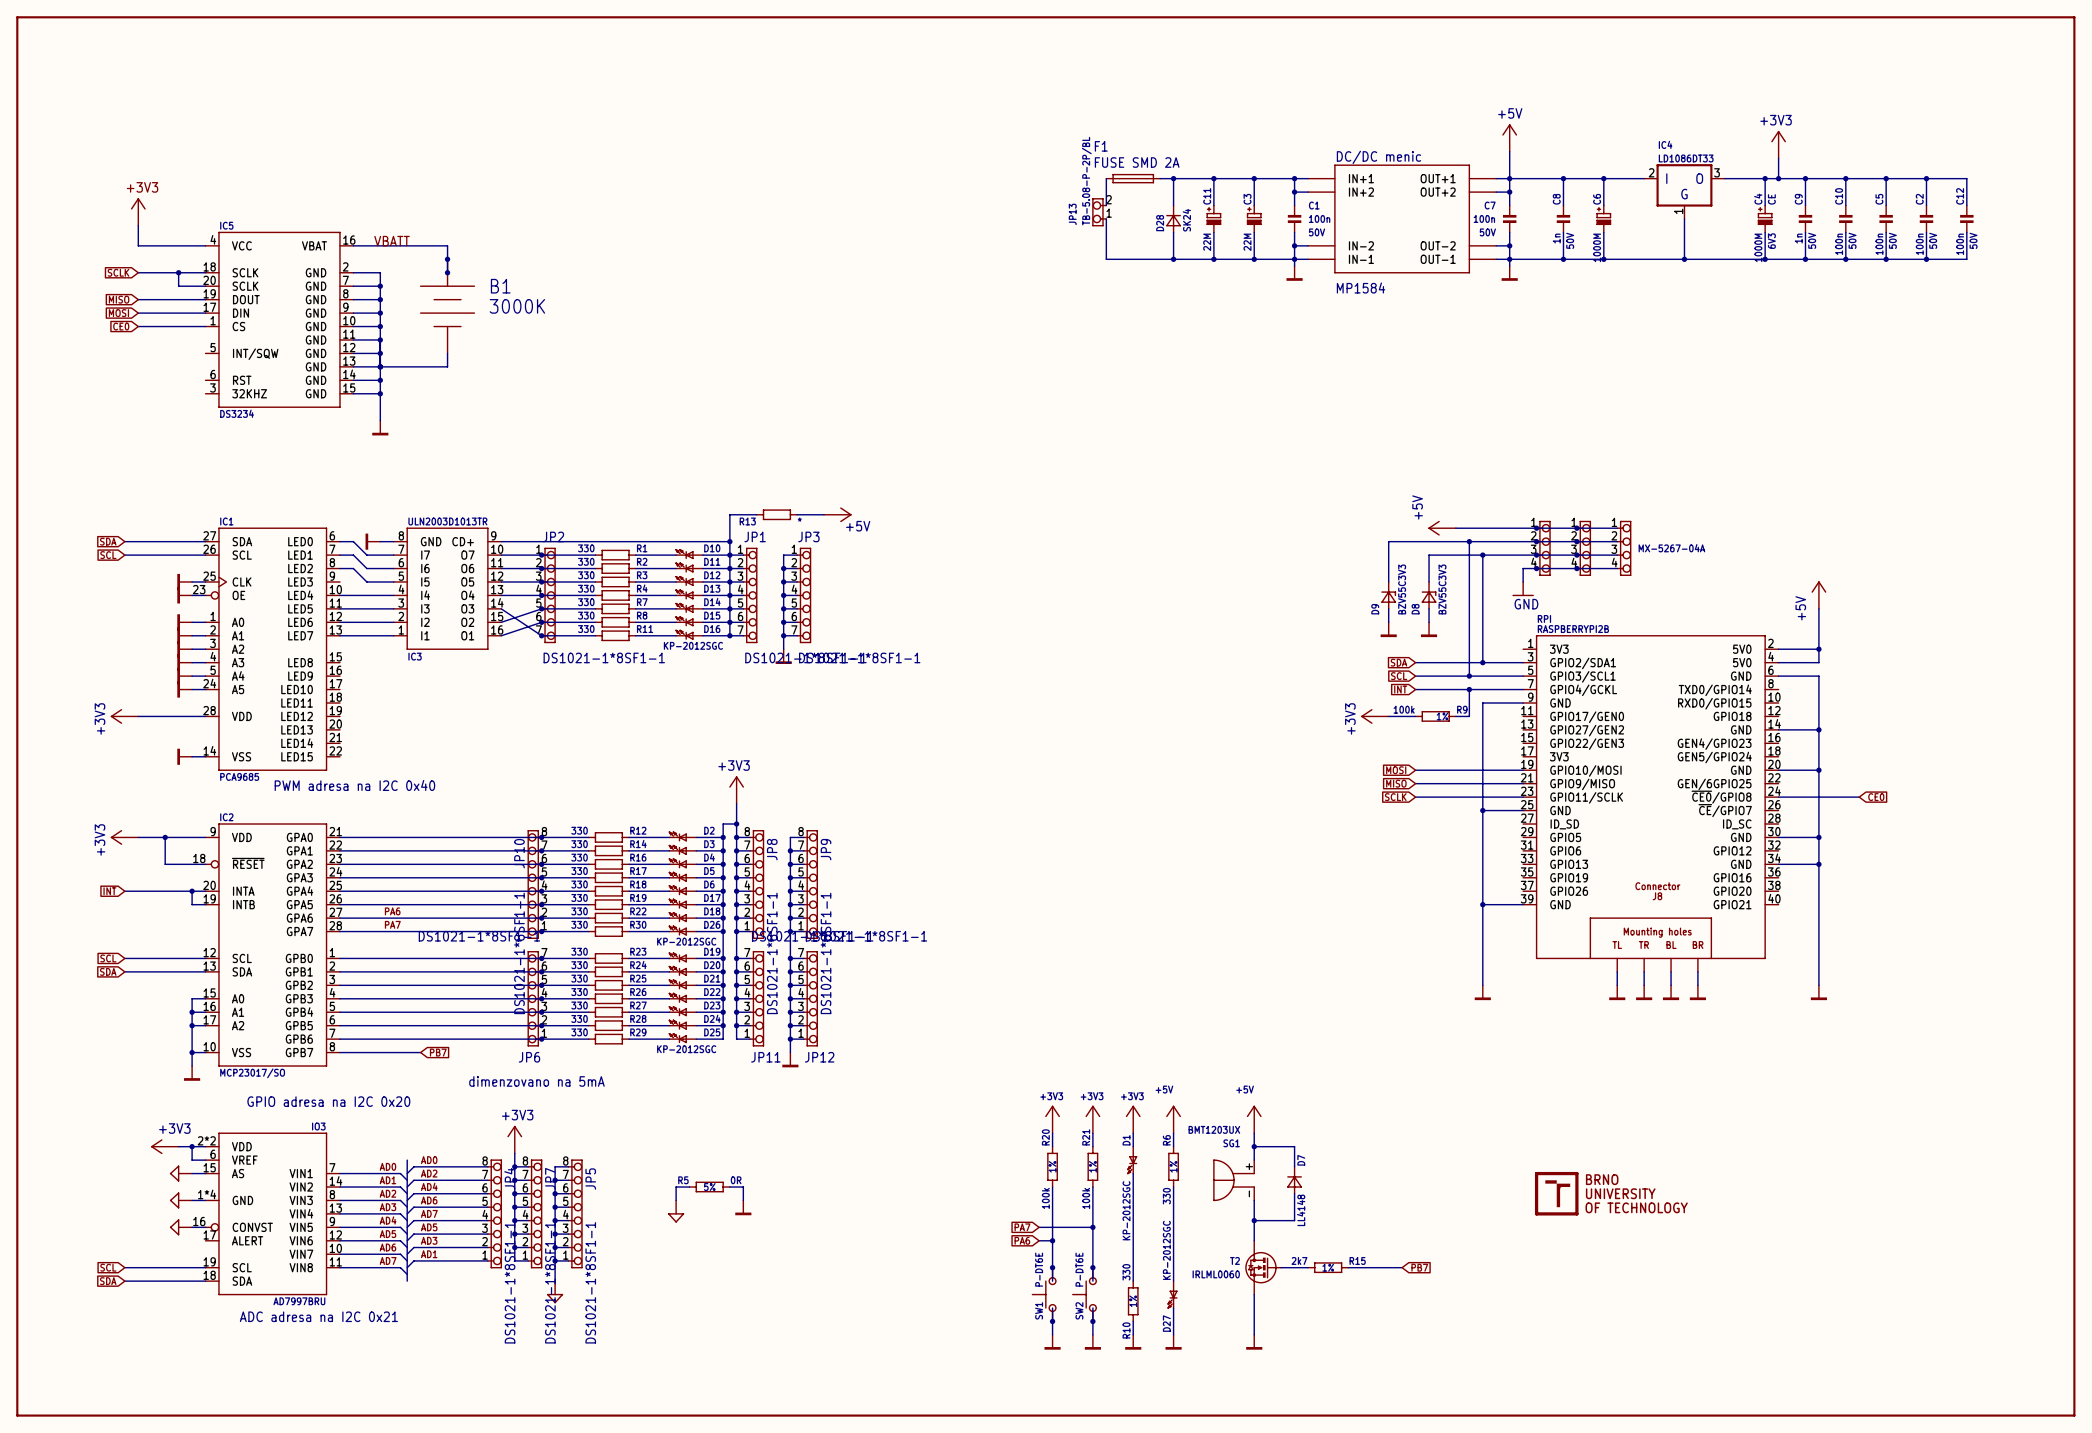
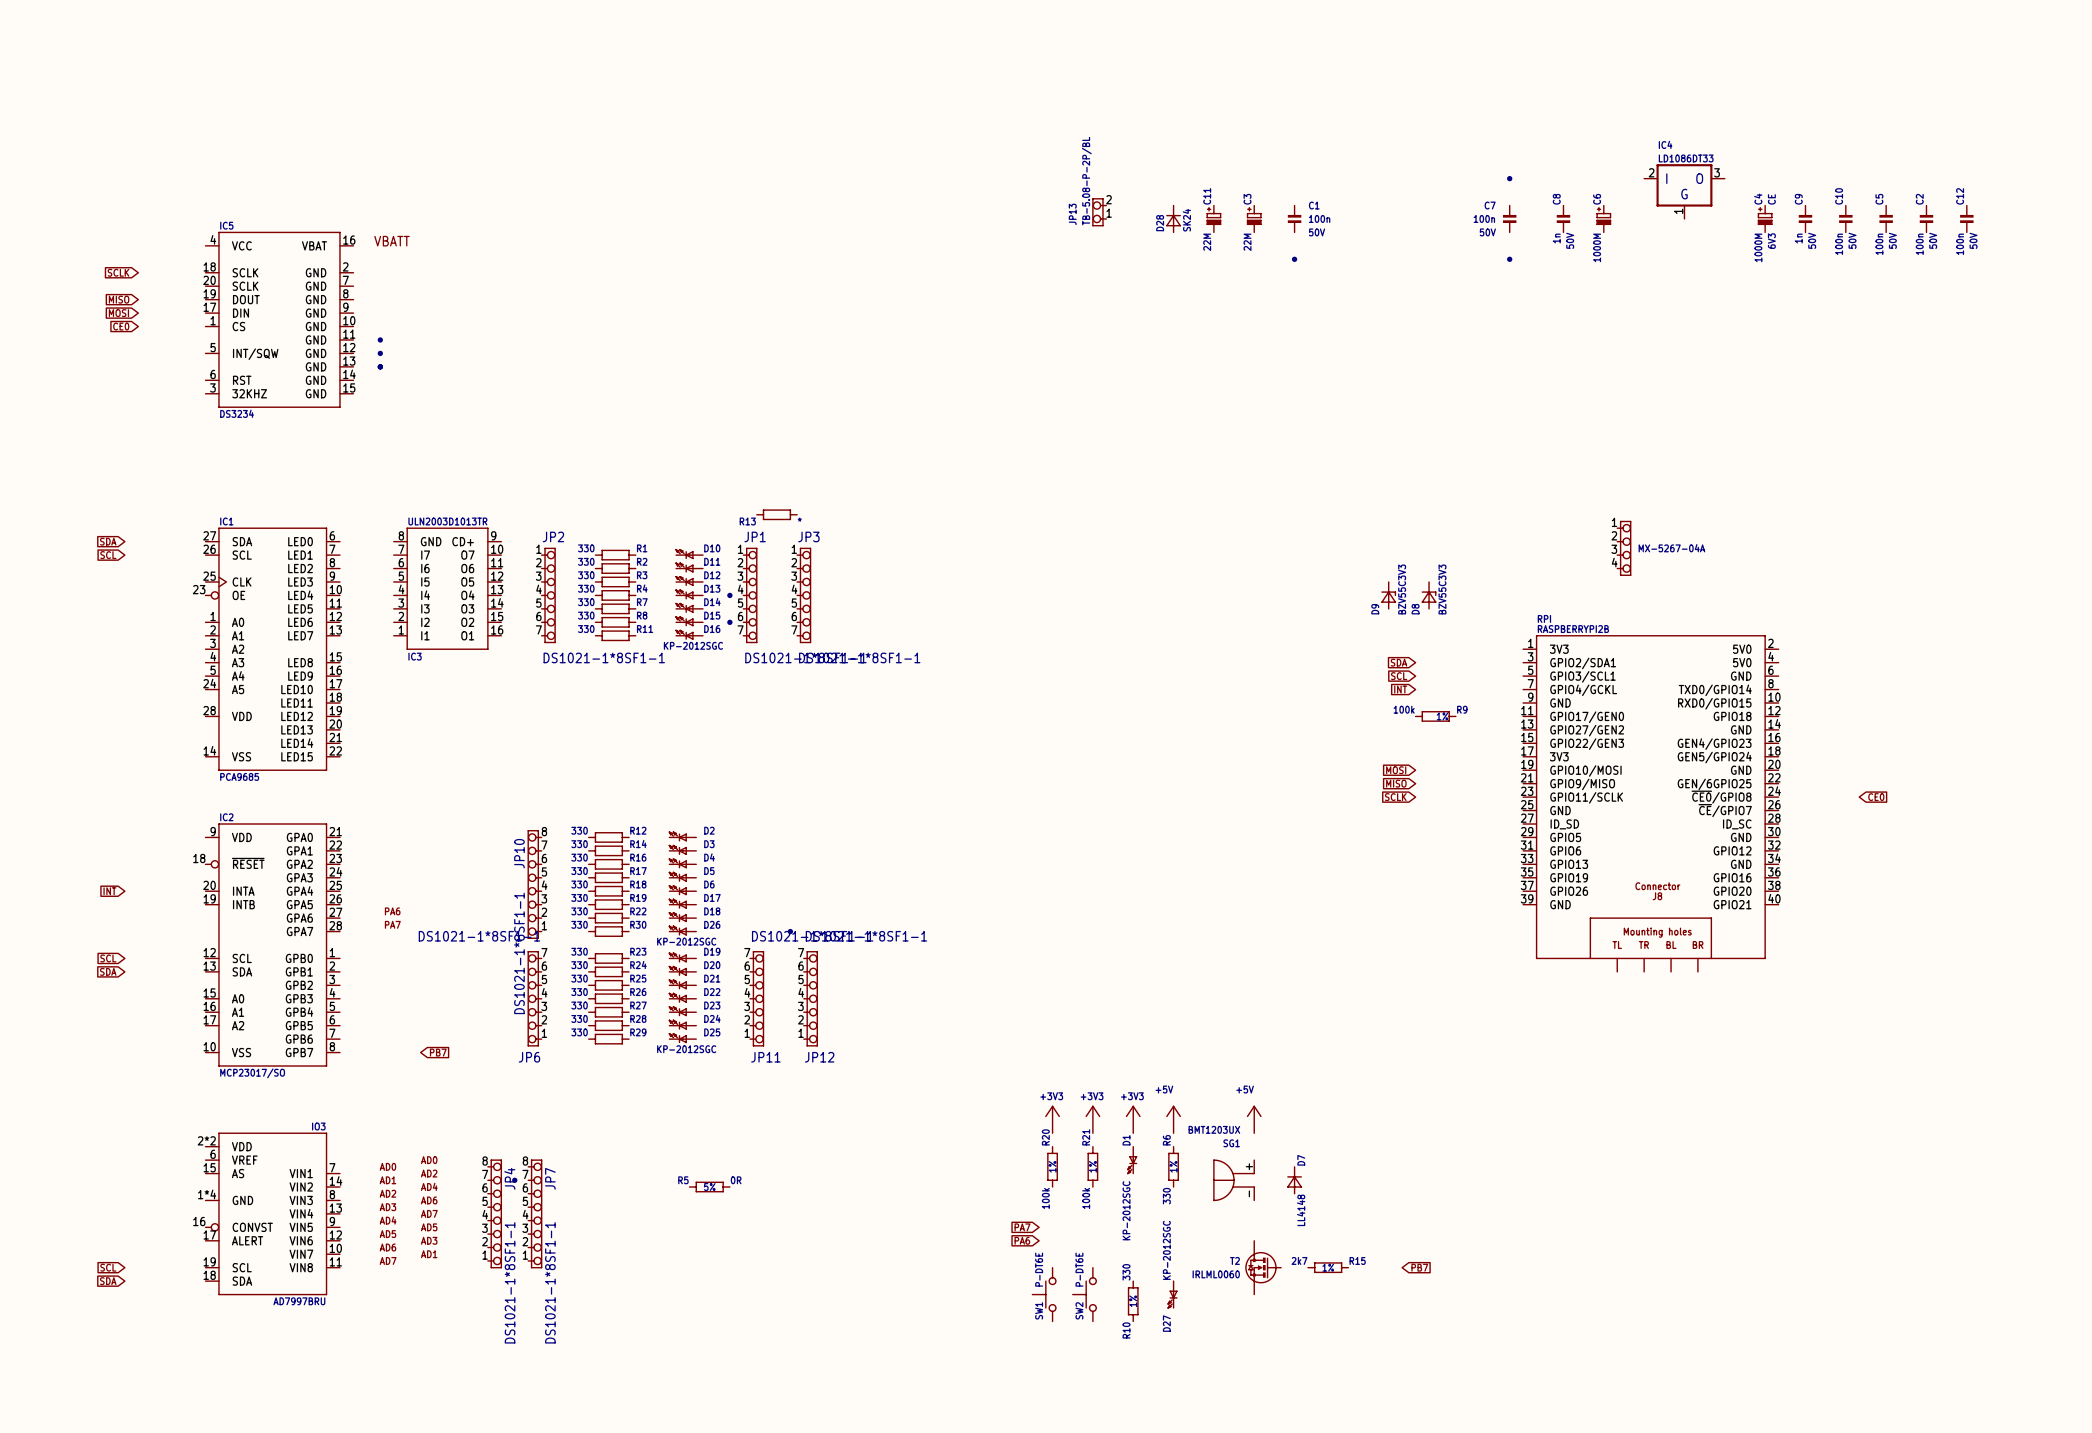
power symbol: +5V (1509, 137) -> none
power symbol: +3V3 (1778, 144) -> none
wire: (1509, 151) (1509, 205) -> none
wire: (1778, 158) (1778, 178) -> none
wire: (1106, 178) (1106, 205) -> none
F1: FUSE SMD 2A (1133, 178) -> none
wire: (1160, 178) (1308, 178) -> none
wire: (1173, 178) (1173, 205) -> none
junction: (1173, 178) -> none
wire: (1213, 178) (1213, 205) -> none
junction: (1213, 178) -> none
wire: (1254, 178) (1254, 205) -> none
junction: (1254, 178) -> none
wire: (1294, 178) (1294, 205) -> none
junction: (1294, 178) -> none
wire: (1496, 178) (1644, 178) -> none
wire: (1563, 178) (1563, 205) -> none
junction: (1563, 178) -> none
wire: (1603, 178) (1603, 205) -> none
junction: (1603, 178) -> none
wire: (1724, 178) (1966, 178) (1966, 205) -> none
wire: (1765, 178) (1765, 205) -> none
junction: (1765, 178) -> none
junction: (1778, 178) -> none
wire: (1805, 178) (1805, 205) -> none
junction: (1805, 178) -> none
wire: (1845, 178) (1845, 205) -> none
junction: (1845, 178) -> none
wire: (1886, 178) (1886, 205) -> none
junction: (1886, 178) -> none
wire: (1926, 178) (1926, 205) -> none
junction: (1926, 178) -> none
label: +3V3 (142, 187) -> none
wire: (1294, 192) (1308, 192) -> none
junction: (1294, 192) -> none
wire: (1496, 192) (1509, 192) -> none
junction: (1509, 192) -> none
power symbol: (138, 211) -> none
wire: (1106, 218) (1106, 259) (1308, 259) -> none
part: MP1584 (1402, 218) -> none
wire: (1684, 218) (1684, 259) -> none
wire: (138, 225) (138, 245) (205, 245) -> none
wire: (1173, 232) (1173, 259) -> none
wire: (1213, 232) (1213, 259) -> none
wire: (1254, 232) (1254, 259) -> none
wire: (1294, 232) (1294, 266) -> none
wire: (1509, 232) (1509, 266) -> none
wire: (1563, 232) (1563, 259) -> none
wire: (1603, 232) (1603, 259) -> none
wire: (1765, 232) (1765, 259) -> none
wire: (1805, 232) (1805, 259) -> none
wire: (1845, 232) (1845, 259) -> none
wire: (1886, 232) (1886, 259) -> none
wire: (1926, 232) (1926, 259) -> none
wire: (1966, 232) (1966, 259) (1496, 259) -> none
wire: (353, 245) (447, 245) (447, 272) -> none
wire: (1294, 245) (1308, 245) -> none
junction: (1294, 245) -> none
wire: (1496, 245) (1509, 245) -> none
junction: (1509, 245) -> none
junction: (447, 259) -> none
junction: (1173, 259) -> none
junction: (1213, 259) -> none
junction: (1254, 259) -> none
junction: (1563, 259) -> none
junction: (1603, 259) -> none
junction: (1684, 259) -> none
junction: (1765, 259) -> none
junction: (1805, 259) -> none
junction: (1845, 259) -> none
junction: (1886, 259) -> none
junction: (1926, 259) -> none
wire: (138, 272) (205, 272) -> none
wire: (178, 272) (178, 286) (205, 286) -> none
junction: (178, 272) -> none
wire: (353, 272) (380, 272) (380, 420) -> none
junction: (447, 272) -> none
power symbol: (1294, 273) -> none
power symbol: (1509, 273) -> none
wire: (353, 286) (380, 286) -> none
junction: (380, 286) -> none
wire: (138, 299) (205, 299) -> none
wire: (353, 299) (380, 299) -> none
junction: (380, 299) -> none
B1: 3000K (447, 306) -> none
wire: (138, 313) (205, 313) -> none
wire: (353, 313) (380, 313) -> none
junction: (380, 313) -> none
wire: (138, 326) (205, 326) -> none
wire: (353, 326) (380, 326) -> none
junction: (380, 326) -> none
wire: (353, 339) (380, 339) -> none
wire: (353, 353) (380, 353) -> none
wire: (447, 353) (447, 366) (353, 366) -> none
wire: (353, 380) (380, 380) -> none
junction: (380, 380) -> none
wire: (353, 393) (380, 393) -> none
junction: (380, 393) -> none
power symbol: (380, 428) -> none
wire: (756, 514) (729, 514) (729, 635) -> none
wire: (797, 514) (824, 514) -> none
power symbol: +5V (837, 514) -> none
power symbol: +5V (1442, 528) -> none
wire: (1455, 528) (1617, 528) -> none
junction: (1536, 528) -> none
junction: (1576, 528) -> none
wire: (124, 541) (205, 541) -> none
wire: (339, 541) (353, 541) (366, 555) (393, 555) -> none
power symbol: (372, 541) -> none
wire: (380, 541) (393, 541) -> none
wire: (501, 541) (729, 541) -> none
junction: (729, 541) -> none
wire: (1469, 541) (1469, 676) -> none
junction: (1469, 541) -> none
junction: (1536, 541) -> none
junction: (1576, 541) -> none
wire: (1617, 541) (1388, 541) (1388, 581) -> none
part: (1543, 548) -> none
part: (1583, 548) -> none
wire: (124, 555) (205, 555) -> none
wire: (339, 555) (353, 555) (366, 568) (393, 568) -> none
wire: (501, 555) (595, 555) -> none
junction: (541, 555) -> none
wire: (635, 555) (676, 555) -> none
wire: (702, 555) (743, 555) -> none
junction: (729, 555) -> none
wire: (797, 555) (783, 555) (783, 649) -> none
wire: (1482, 555) (1482, 662) -> none
junction: (1482, 555) -> none
junction: (1536, 555) -> none
junction: (1576, 555) -> none
wire: (1617, 555) (1429, 555) (1429, 581) -> none
wire: (339, 568) (353, 568) (366, 581) (393, 581) -> none
wire: (501, 568) (595, 568) -> none
junction: (541, 568) -> none
wire: (635, 568) (676, 568) -> none
wire: (702, 568) (743, 568) -> none
junction: (729, 568) -> none
wire: (783, 568) (797, 568) -> none
junction: (783, 568) -> none
junction: (1536, 568) -> none
junction: (1576, 568) -> none
wire: (1617, 568) (1523, 568) (1523, 581) -> none
power symbol: (184, 581) -> none
wire: (192, 581) (205, 581) -> none
wire: (501, 581) (595, 581) -> none
junction: (541, 581) -> none
wire: (635, 581) (676, 581) -> none
wire: (702, 581) (743, 581) -> none
junction: (729, 581) -> none
wire: (783, 581) (797, 581) -> none
junction: (783, 581) -> none
power symbol: GND (1523, 589) -> none
power symbol: (184, 595) -> none
wire: (192, 595) (205, 595) -> none
wire: (339, 595) (393, 595) -> none
wire: (501, 595) (595, 595) -> none
junction: (541, 595) -> none
wire: (635, 595) (676, 595) -> none
wire: (702, 595) (743, 595) -> none
wire: (783, 595) (797, 595) -> none
junction: (783, 595) -> none
power symbol: +5V (1818, 595) -> none
wire: (339, 608) (393, 608) -> none
wire: (501, 608) (541, 635) (595, 635) -> none
junction: (541, 608) -> none
wire: (595, 608) (541, 608) (501, 622) -> none
wire: (635, 608) (676, 608) -> none
wire: (702, 608) (743, 608) -> none
junction: (729, 608) -> none
wire: (783, 608) (797, 608) -> none
junction: (783, 608) -> none
wire: (1388, 608) (1388, 622) -> none
wire: (1429, 608) (1429, 622) -> none
wire: (1818, 608) (1818, 662) (1778, 662) -> none
power symbol: (184, 622) -> none
wire: (192, 622) (205, 622) -> none
wire: (339, 622) (393, 622) -> none
junction: (541, 622) -> none
wire: (595, 622) (541, 622) (501, 635) -> none
wire: (635, 622) (676, 622) -> none
wire: (702, 622) (743, 622) -> none
wire: (783, 622) (797, 622) -> none
junction: (783, 622) -> none
power symbol: (1388, 629) -> none
power symbol: (1429, 629) -> none
power symbol: (184, 635) -> none
wire: (192, 635) (205, 635) -> none
wire: (339, 635) (393, 635) -> none
junction: (541, 635) -> none
wire: (635, 635) (676, 635) -> none
wire: (702, 635) (743, 635) -> none
junction: (729, 635) -> none
wire: (783, 635) (797, 635) -> none
junction: (783, 635) -> none
power symbol: (184, 649) -> none
wire: (192, 649) (205, 649) -> none
wire: (1778, 649) (1818, 649) -> none
junction: (1818, 649) -> none
power symbol: (783, 656) -> none
power symbol: (184, 662) -> none
wire: (192, 662) (205, 662) -> none
wire: (1415, 662) (1523, 662) -> none
junction: (1482, 662) -> none
power symbol: (184, 676) -> none
wire: (192, 676) (205, 676) -> none
wire: (1415, 676) (1523, 676) -> none
junction: (1469, 676) -> none
wire: (1778, 676) (1818, 676) (1818, 985) -> none
power symbol: (184, 689) -> none
wire: (192, 689) (205, 689) -> none
wire: (1415, 689) (1523, 689) -> none
wire: (1469, 689) (1469, 716) (1455, 716) -> none
junction: (1469, 689) -> none
wire: (1523, 702) (1482, 702) (1482, 985) -> none
power symbol: +3V3 (124, 716) -> none
wire: (138, 716) (205, 716) -> none
part: (1045, 716) -> none
power symbol: +3V3 (1374, 716) -> none
wire: (1388, 716) (1415, 716) -> none
wire: (1778, 729) (1818, 729) -> none
junction: (1818, 729) -> none
power symbol: (184, 756) -> none
wire: (192, 756) (205, 756) -> none
wire: (1415, 770) (1523, 770) -> none
wire: (1778, 770) (1818, 770) -> none
junction: (1818, 770) -> none
wire: (1415, 783) (1523, 783) -> none
text: PWM adresa na I2C 0x40 (354, 785) -> none
power symbol: +3V3 (736, 790) -> none
wire: (1415, 797) (1523, 797) -> none
wire: (1778, 797) (1859, 797) -> none
wire: (736, 803) (736, 1039) (750, 1039) -> none
wire: (1482, 810) (1523, 810) -> none
junction: (1482, 810) -> none
wire: (736, 824) (723, 824) (723, 1039) (696, 1039) -> none
junction: (736, 824) -> none
power symbol: +3V3 (124, 837) -> none
wire: (138, 837) (205, 837) -> none
wire: (165, 837) (165, 864) (205, 864) -> none
junction: (165, 837) -> none
wire: (339, 837) (588, 837) -> none
junction: (541, 837) -> none
wire: (629, 837) (669, 837) -> none
wire: (696, 837) (723, 837) -> none
junction: (723, 837) -> none
wire: (736, 837) (750, 837) -> none
junction: (736, 837) -> none
wire: (803, 837) (790, 837) (790, 1052) -> none
wire: (1778, 837) (1818, 837) -> none
junction: (1818, 837) -> none
wire: (339, 850) (588, 850) -> none
junction: (541, 850) -> none
wire: (629, 850) (669, 850) -> none
wire: (696, 850) (723, 850) -> none
junction: (723, 850) -> none
wire: (736, 850) (750, 850) -> none
junction: (736, 850) -> none
wire: (790, 850) (803, 850) -> none
junction: (790, 850) -> none
wire: (339, 864) (588, 864) -> none
junction: (541, 864) -> none
wire: (629, 864) (669, 864) -> none
wire: (696, 864) (723, 864) -> none
junction: (723, 864) -> none
wire: (736, 864) (750, 864) -> none
junction: (736, 864) -> none
wire: (790, 864) (803, 864) -> none
junction: (790, 864) -> none
wire: (1778, 864) (1818, 864) -> none
junction: (1818, 864) -> none
wire: (339, 877) (588, 877) -> none
junction: (541, 877) -> none
wire: (629, 877) (669, 877) -> none
wire: (696, 877) (723, 877) -> none
junction: (723, 877) -> none
wire: (736, 877) (750, 877) -> none
junction: (736, 877) -> none
wire: (790, 877) (803, 877) -> none
junction: (790, 877) -> none
JP8: DS1021-1*8SF1-1 (757, 884) -> none
JP9: DS1021-1*8SF1-1 (810, 884) -> none
wire: (124, 891) (205, 891) -> none
wire: (192, 891) (192, 904) (205, 904) -> none
junction: (192, 891) -> none
wire: (339, 891) (588, 891) -> none
junction: (541, 891) -> none
wire: (629, 891) (669, 891) -> none
wire: (696, 891) (723, 891) -> none
junction: (723, 891) -> none
wire: (736, 891) (750, 891) -> none
junction: (736, 891) -> none
wire: (790, 891) (803, 891) -> none
junction: (790, 891) -> none
wire: (339, 904) (588, 904) -> none
junction: (541, 904) -> none
wire: (629, 904) (669, 904) -> none
wire: (696, 904) (723, 904) -> none
junction: (723, 904) -> none
wire: (736, 904) (750, 904) -> none
junction: (736, 904) -> none
wire: (790, 904) (803, 904) -> none
junction: (790, 904) -> none
wire: (1482, 904) (1523, 904) -> none
junction: (1482, 904) -> none
wire: (339, 918) (588, 918) -> none
junction: (541, 918) -> none
wire: (629, 918) (669, 918) -> none
wire: (696, 918) (723, 918) -> none
junction: (723, 918) -> none
wire: (736, 918) (750, 918) -> none
junction: (736, 918) -> none
wire: (790, 918) (803, 918) -> none
junction: (790, 918) -> none
wire: (339, 931) (588, 931) -> none
junction: (541, 931) -> none
wire: (629, 931) (669, 931) -> none
wire: (696, 931) (723, 931) -> none
junction: (723, 931) -> none
wire: (736, 931) (750, 931) -> none
junction: (736, 931) -> none
wire: (790, 931) (803, 931) -> none
wire: (124, 958) (205, 958) -> none
wire: (339, 958) (588, 958) -> none
junction: (541, 958) -> none
wire: (629, 958) (669, 958) -> none
wire: (696, 958) (723, 958) -> none
junction: (723, 958) -> none
wire: (736, 958) (750, 958) -> none
junction: (736, 958) -> none
wire: (790, 958) (803, 958) -> none
junction: (790, 958) -> none
wire: (124, 971) (205, 971) -> none
wire: (339, 971) (588, 971) -> none
junction: (541, 971) -> none
wire: (629, 971) (669, 971) -> none
wire: (696, 971) (723, 971) -> none
junction: (723, 971) -> none
wire: (736, 971) (750, 971) -> none
junction: (736, 971) -> none
wire: (790, 971) (803, 971) -> none
junction: (790, 971) -> none
wire: (1617, 971) (1617, 985) -> none
wire: (1644, 971) (1644, 985) -> none
wire: (1671, 971) (1671, 985) -> none
wire: (1697, 971) (1697, 985) -> none
wire: (339, 985) (588, 985) -> none
junction: (541, 985) -> none
wire: (629, 985) (669, 985) -> none
wire: (696, 985) (723, 985) -> none
junction: (723, 985) -> none
wire: (736, 985) (750, 985) -> none
junction: (736, 985) -> none
wire: (790, 985) (803, 985) -> none
junction: (790, 985) -> none
power symbol: (1482, 992) -> none
power symbol: (1617, 992) -> none
power symbol: (1644, 992) -> none
power symbol: (1671, 992) -> none
power symbol: (1697, 992) -> none
power symbol: (1818, 992) -> none
wire: (205, 998) (192, 998) (192, 1066) -> none
wire: (339, 998) (588, 998) -> none
junction: (541, 998) -> none
wire: (629, 998) (669, 998) -> none
wire: (696, 998) (723, 998) -> none
junction: (723, 998) -> none
wire: (736, 998) (750, 998) -> none
junction: (736, 998) -> none
wire: (790, 998) (803, 998) -> none
junction: (790, 998) -> none
wire: (192, 1012) (205, 1012) -> none
junction: (192, 1012) -> none
wire: (339, 1012) (588, 1012) -> none
junction: (541, 1012) -> none
wire: (629, 1012) (669, 1012) -> none
wire: (696, 1012) (723, 1012) -> none
junction: (723, 1012) -> none
wire: (736, 1012) (750, 1012) -> none
junction: (736, 1012) -> none
wire: (790, 1012) (803, 1012) -> none
junction: (790, 1012) -> none
wire: (192, 1025) (205, 1025) -> none
junction: (192, 1025) -> none
wire: (339, 1025) (588, 1025) -> none
junction: (541, 1025) -> none
wire: (629, 1025) (669, 1025) -> none
wire: (696, 1025) (723, 1025) -> none
junction: (723, 1025) -> none
wire: (736, 1025) (750, 1025) -> none
junction: (736, 1025) -> none
wire: (790, 1025) (803, 1025) -> none
junction: (790, 1025) -> none
wire: (339, 1039) (588, 1039) -> none
junction: (541, 1039) -> none
wire: (629, 1039) (669, 1039) -> none
wire: (790, 1039) (803, 1039) -> none
junction: (790, 1039) -> none
wire: (192, 1052) (205, 1052) -> none
junction: (192, 1052) -> none
wire: (339, 1052) (420, 1052) -> none
power symbol: (790, 1059) -> none
power symbol: (192, 1073) -> none
text: dimenzovano na 5mA (536, 1081) -> none
text: GPIO adresa na I2C 0x20 (328, 1101) -> none
wire: (1052, 1133) (1052, 1146) -> none
wire: (1092, 1133) (1092, 1146) -> none
wire: (1133, 1133) (1133, 1146) -> none
wire: (1173, 1133) (1173, 1146) -> none
wire: (1254, 1133) (1254, 1160) -> none
power symbol: +3V3 (514, 1139) -> none
power symbol: +3V3 (164, 1146) -> none
wire: (178, 1146) (205, 1146) -> none
wire: (192, 1146) (192, 1160) (205, 1160) -> none
junction: (192, 1146) -> none
wire: (1254, 1146) (1294, 1146) (1294, 1166) -> none
junction: (1254, 1146) -> none
wire: (514, 1153) (514, 1260) (528, 1260) -> none
bus: (407, 1160) (407, 1281) -> none
wire: (487, 1166) (413, 1166) (407, 1173) -> none
wire: (514, 1166) (528, 1166) -> none
junction: (514, 1166) -> none
wire: (568, 1166) (555, 1166) (555, 1281) -> none
power symbol: (180, 1173) -> none
wire: (192, 1173) (205, 1173) -> none
wire: (339, 1173) (400, 1173) (407, 1180) -> none
wire: (1133, 1173) (1133, 1281) -> none
wire: (487, 1180) (413, 1180) (407, 1187) -> none
wire: (514, 1180) (528, 1180) -> none
wire: (555, 1180) (568, 1180) -> none
junction: (555, 1180) -> none
wire: (339, 1187) (400, 1187) (407, 1193) -> none
wire: (689, 1187) (676, 1187) (676, 1200) -> none
wire: (729, 1187) (743, 1187) (743, 1200) -> none
wire: (1052, 1187) (1052, 1281) -> none
wire: (1092, 1187) (1092, 1281) -> none
wire: (1173, 1187) (1173, 1281) -> none
wire: (487, 1193) (413, 1193) (407, 1200) -> none
wire: (514, 1193) (528, 1193) -> none
junction: (514, 1193) -> none
wire: (555, 1193) (568, 1193) -> none
junction: (555, 1193) -> none
wire: (1294, 1193) (1294, 1220) (1254, 1220) -> none
part: (1556, 1193) -> none
power symbol: (180, 1200) -> none
wire: (192, 1200) (205, 1200) -> none
wire: (339, 1200) (400, 1200) (407, 1207) -> none
wire: (1254, 1200) (1254, 1240) -> none
wire: (487, 1207) (413, 1207) (407, 1213) -> none
wire: (514, 1207) (528, 1207) -> none
junction: (514, 1207) -> none
wire: (555, 1207) (568, 1207) -> none
junction: (555, 1207) -> none
power symbol: (743, 1207) -> none
power symbol: (676, 1211) -> none
wire: (339, 1213) (400, 1213) (407, 1220) -> none
JP5: DS1021-1*8SF1-1 (575, 1213) -> none
wire: (487, 1220) (413, 1220) (407, 1227) -> none
wire: (514, 1220) (528, 1220) -> none
junction: (514, 1220) -> none
wire: (555, 1220) (568, 1220) -> none
junction: (555, 1220) -> none
junction: (1254, 1220) -> none
power symbol: (180, 1227) -> none
wire: (192, 1227) (205, 1227) -> none
wire: (339, 1227) (400, 1227) (407, 1234) -> none
wire: (1039, 1227) (1092, 1227) -> none
junction: (1092, 1227) -> none
wire: (487, 1234) (413, 1234) (407, 1240) -> none
wire: (514, 1234) (528, 1234) -> none
junction: (514, 1234) -> none
wire: (555, 1234) (568, 1234) -> none
junction: (555, 1234) -> none
wire: (339, 1240) (400, 1240) (407, 1247) -> none
wire: (1039, 1240) (1052, 1240) -> none
junction: (1052, 1240) -> none
wire: (487, 1247) (413, 1247) (407, 1254) -> none
wire: (514, 1247) (528, 1247) -> none
junction: (514, 1247) -> none
wire: (555, 1247) (568, 1247) -> none
junction: (555, 1247) -> none
wire: (339, 1254) (400, 1254) (407, 1260) -> none
wire: (487, 1260) (413, 1260) (407, 1267) -> none
wire: (555, 1260) (568, 1260) -> none
junction: (555, 1260) -> none
wire: (124, 1267) (205, 1267) -> none
wire: (339, 1267) (400, 1267) (407, 1274) -> none
junction: (1052, 1267) -> none
junction: (1092, 1267) -> none
wire: (1281, 1267) (1308, 1267) -> none
wire: (1348, 1267) (1402, 1267) -> none
wire: (124, 1281) (205, 1281) -> none
power symbol: (555, 1292) -> none
wire: (1254, 1294) (1254, 1334) -> none
wire: (1052, 1308) (1052, 1334) -> none
wire: (1092, 1308) (1092, 1334) -> none
wire: (1173, 1308) (1173, 1334) -> none
text: ADC adresa na I2C 0x21 (318, 1316) -> none
junction: (1052, 1321) -> none
junction: (1092, 1321) -> none
wire: (1133, 1321) (1133, 1334) -> none
power symbol: (1052, 1342) -> none
power symbol: (1092, 1342) -> none
power symbol: (1133, 1342) -> none
power symbol: (1173, 1342) -> none
power symbol: (1254, 1342) -> none

